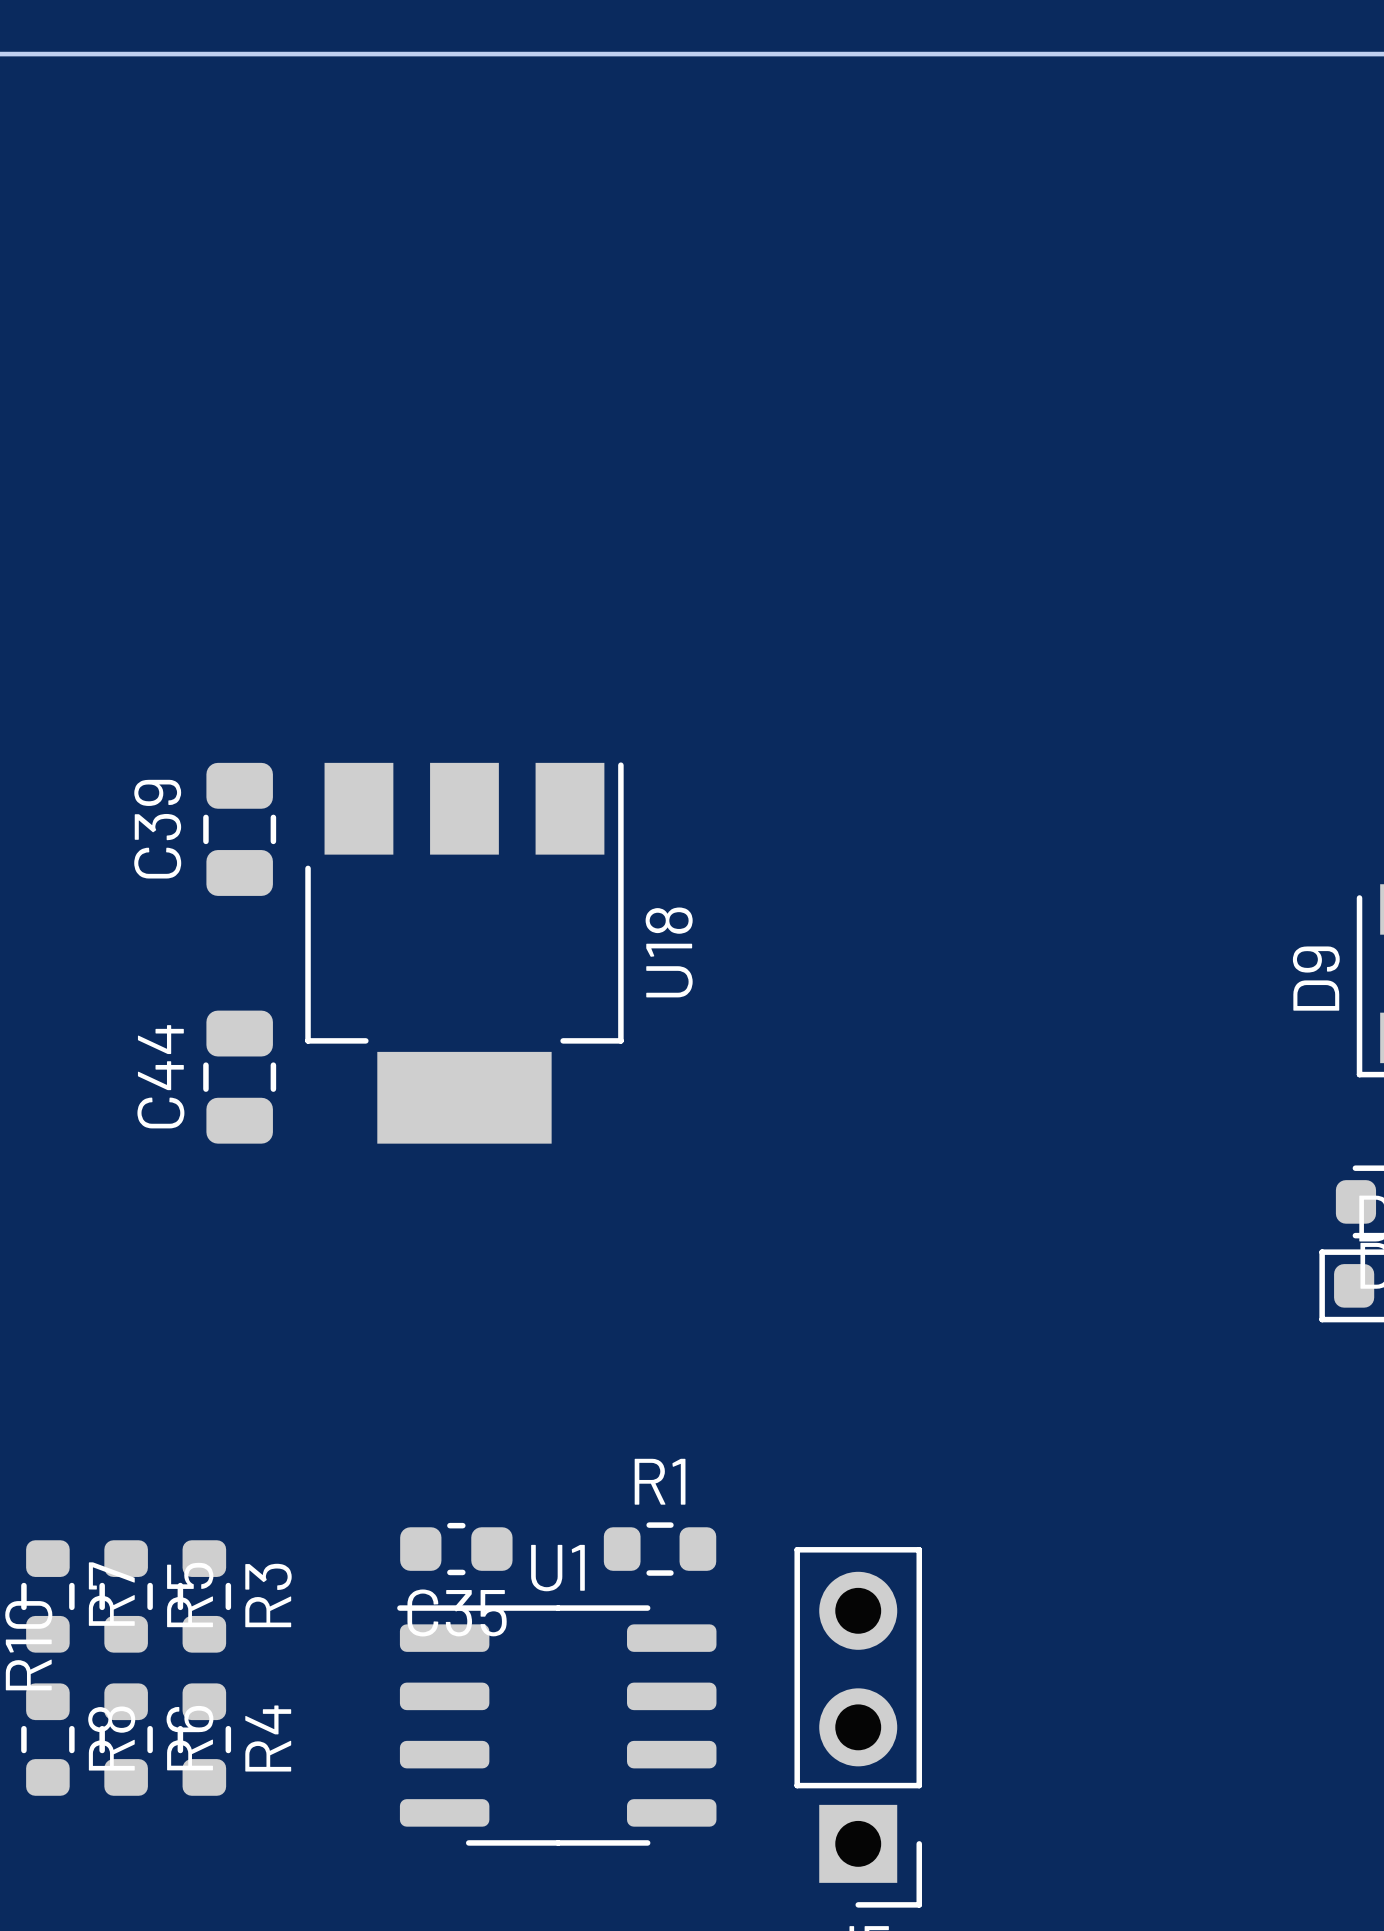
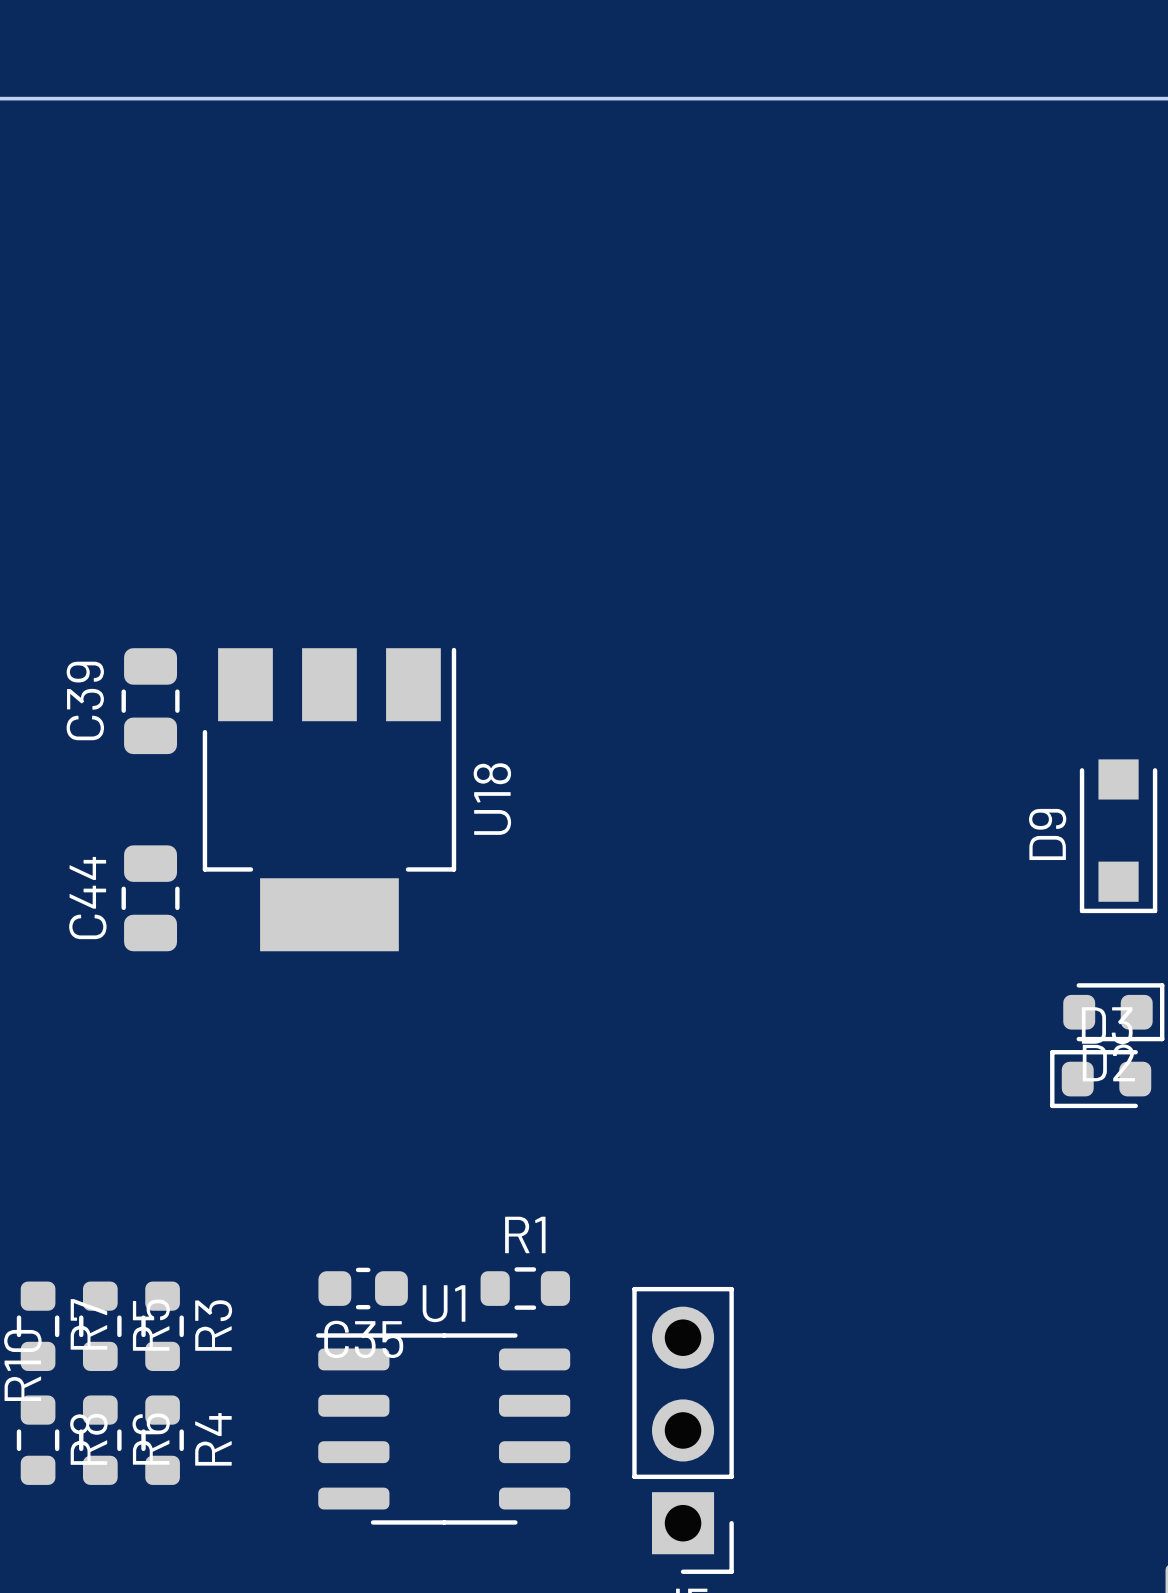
C39 position: (239, 829) -> (150, 701)
U18 position: (464, 953) -> (329, 799)
C44 position: (239, 1077) -> (150, 898)

